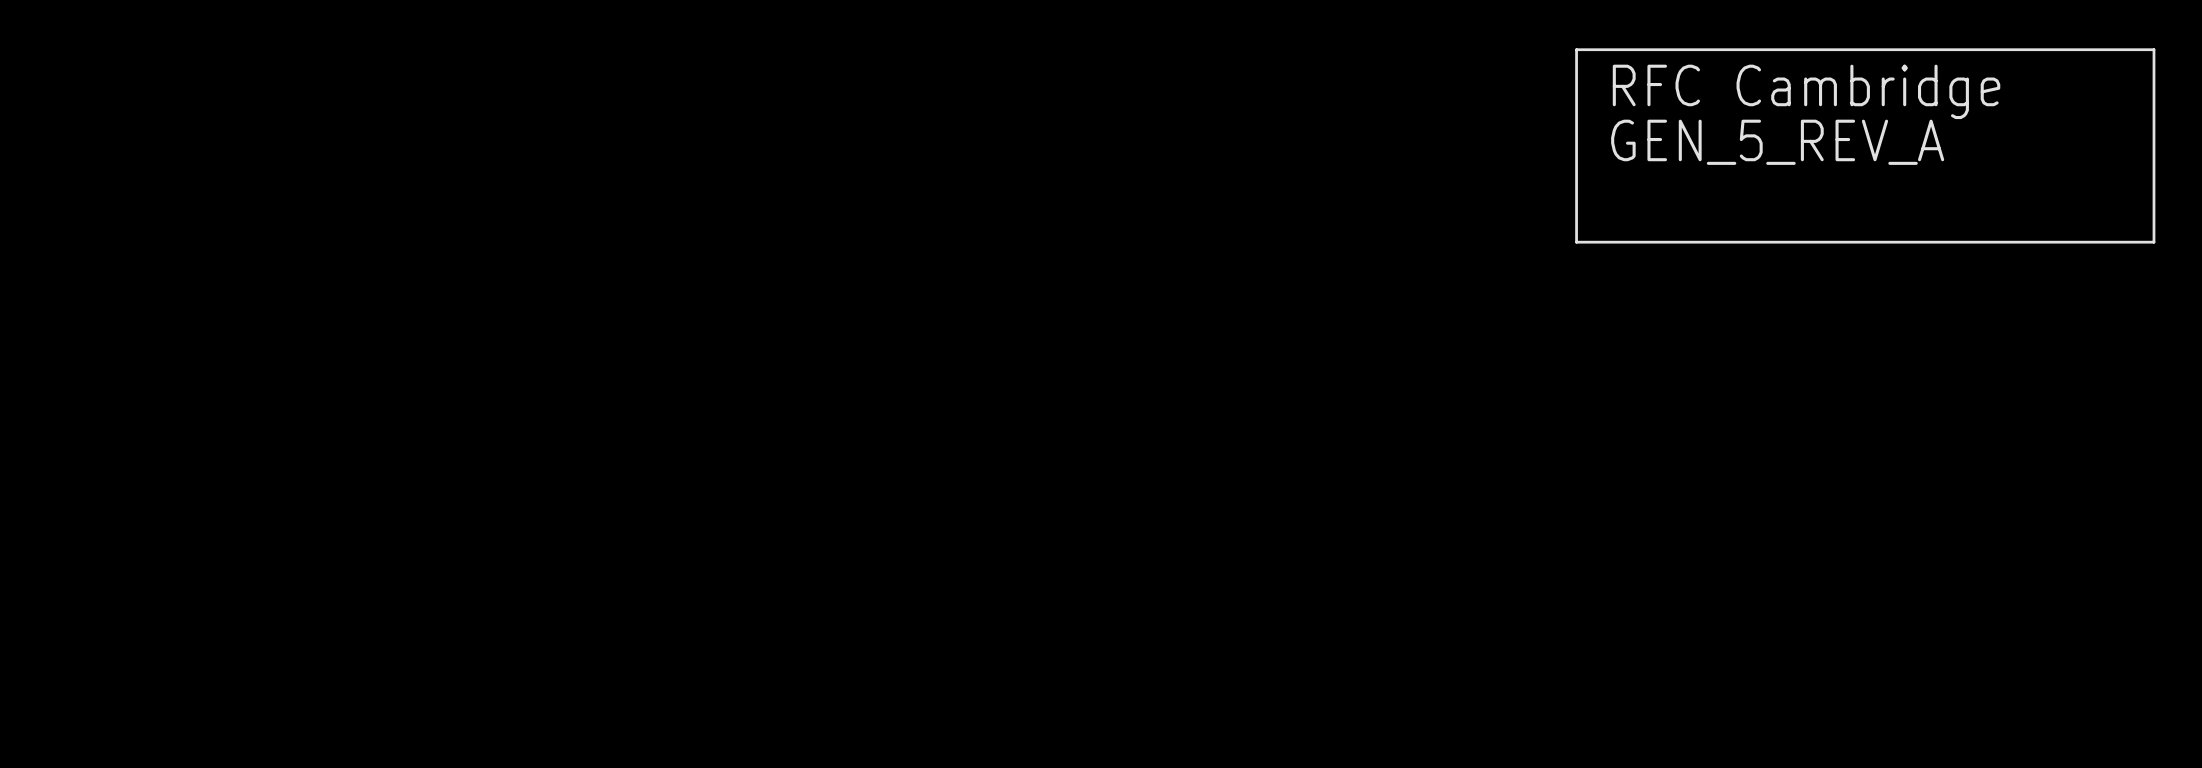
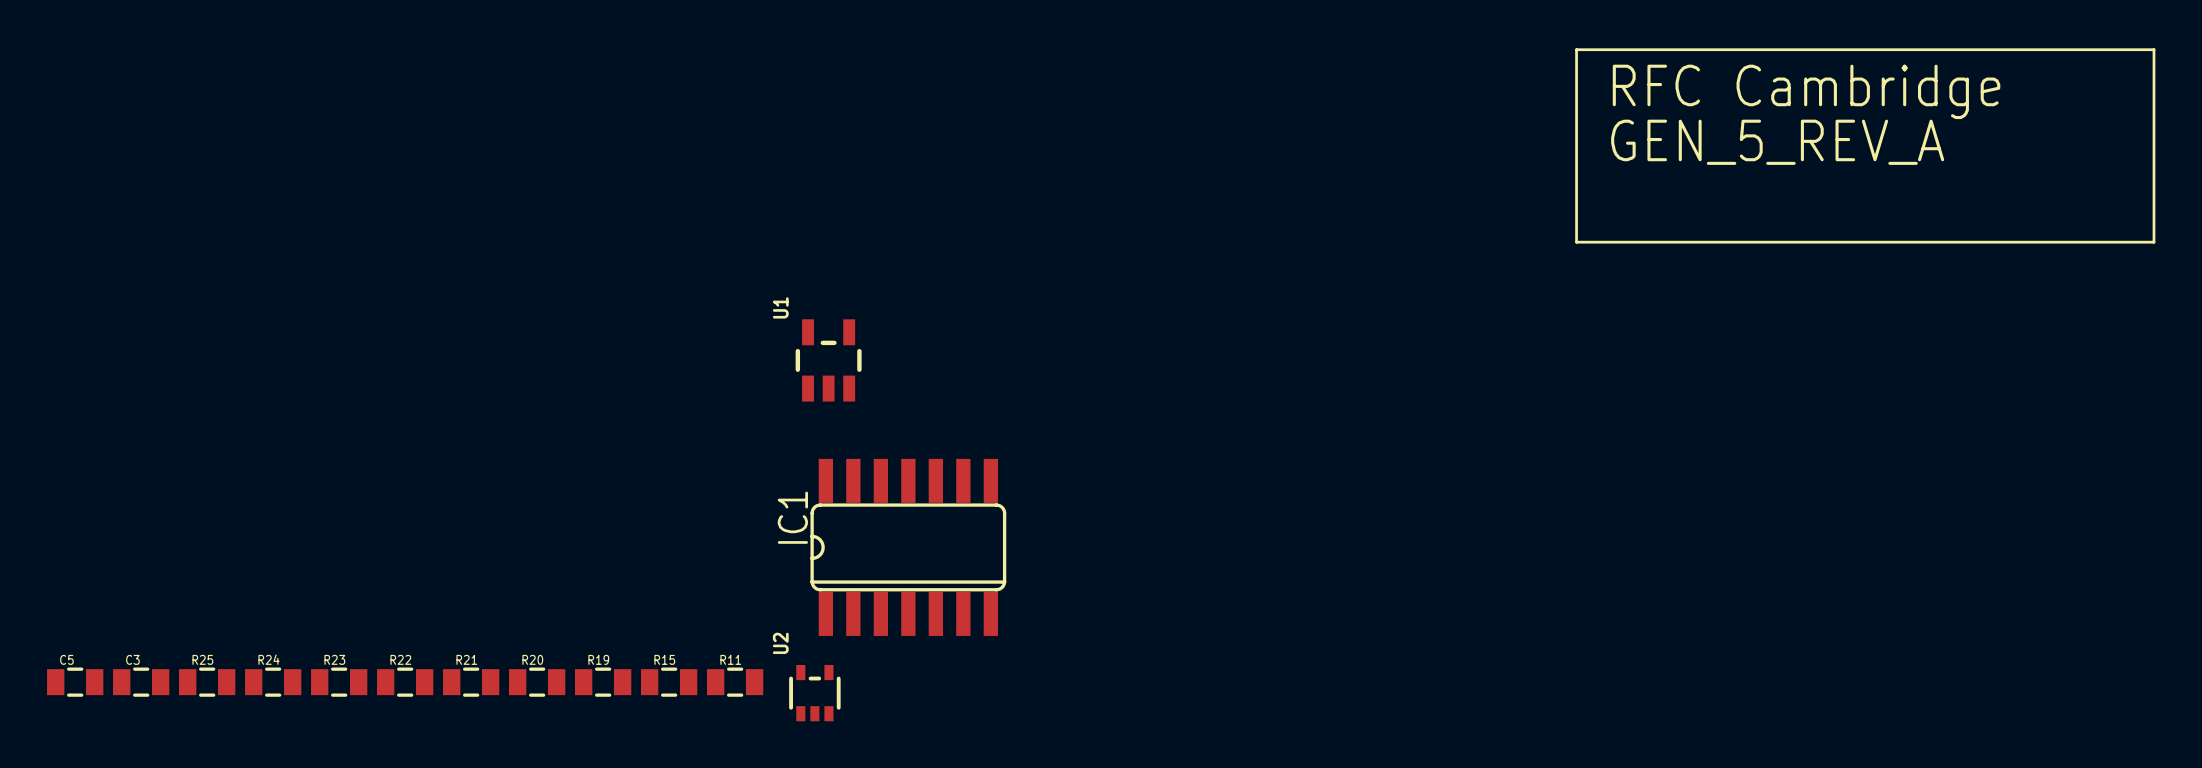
U1: none -> (828, 360)
IC1: none -> (908, 547)
C5: none -> (75, 682)
C3: none -> (141, 682)
R25: none -> (207, 682)
R24: none -> (273, 682)
R23: none -> (339, 682)
R22: none -> (405, 682)
R21: none -> (471, 682)
R20: none -> (537, 682)
R19: none -> (603, 682)
R15: none -> (669, 682)
R11: none -> (735, 682)
U2: none -> (814, 693)

